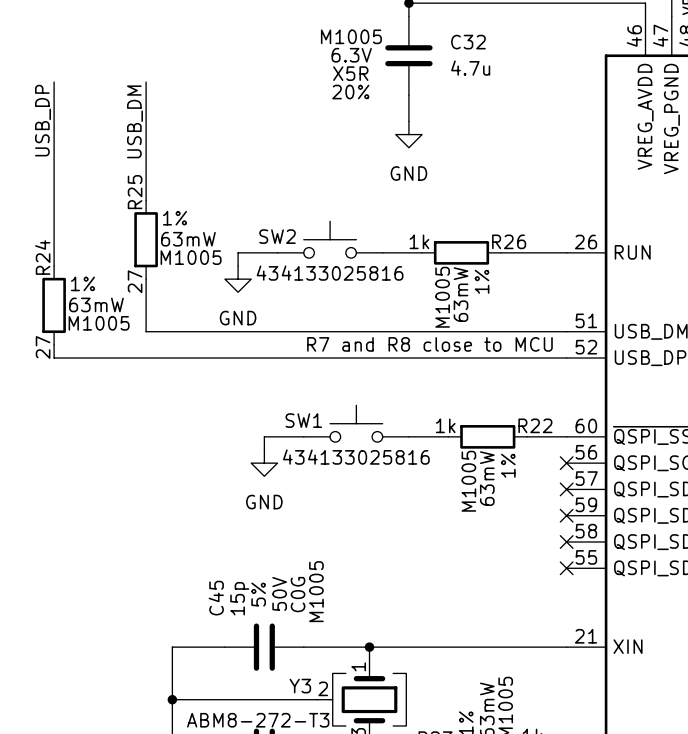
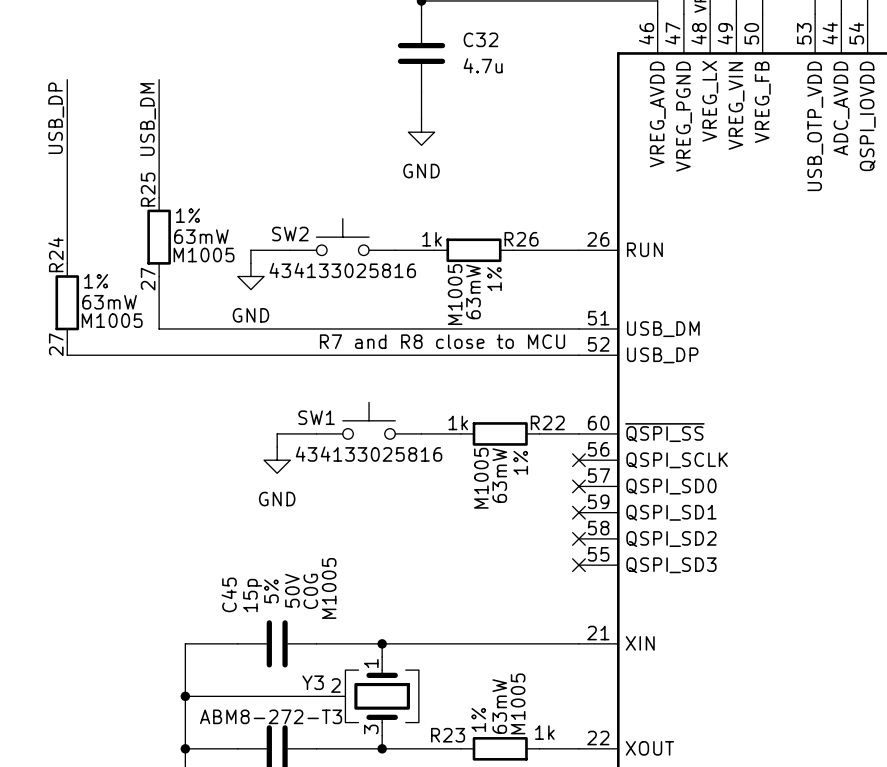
C32 text: M1005 (351, 36) -> none
C32 text: 6.3V (351, 55) -> none
C32 text: X5R (350, 73) -> none
C32 text: 20% (350, 92) -> none

